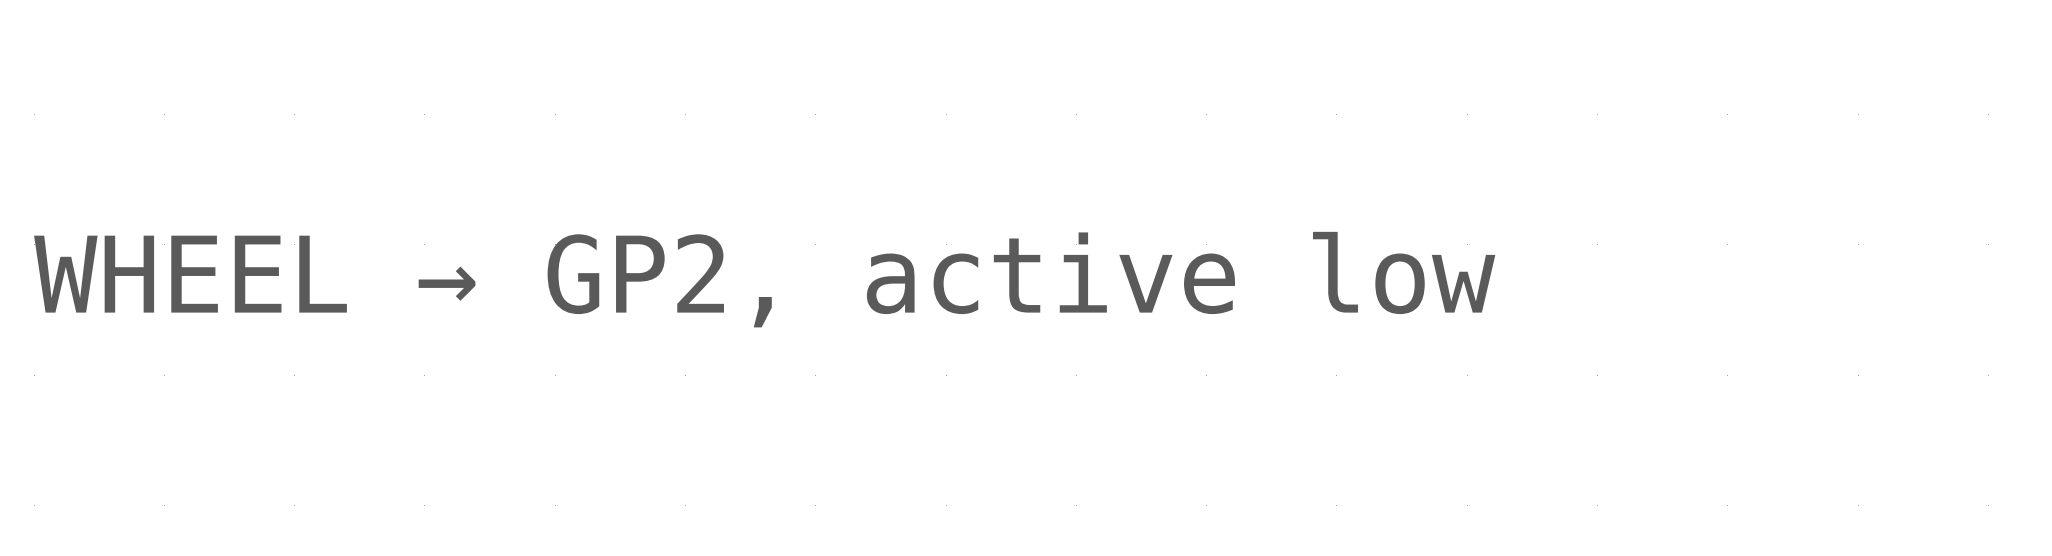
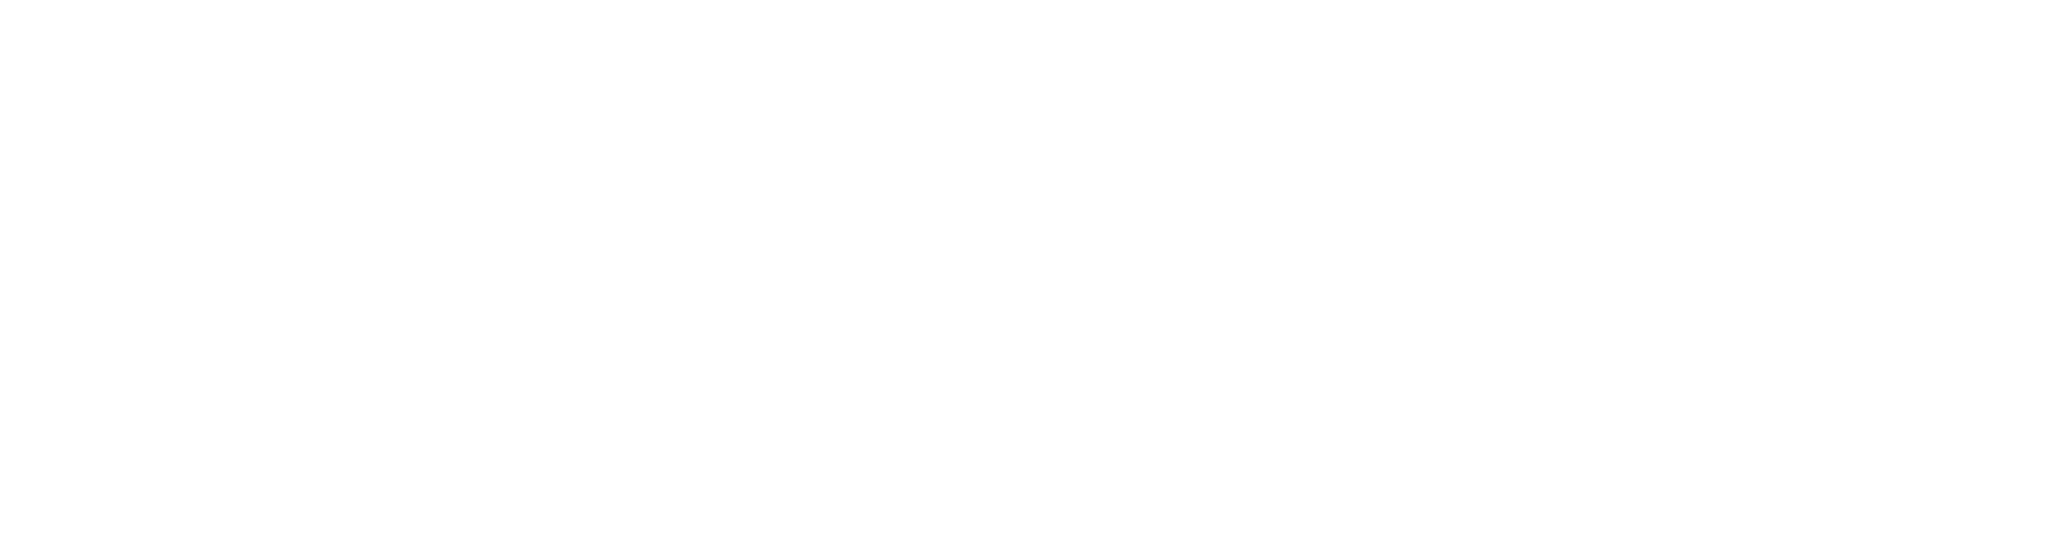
text: WHEEL → GP2, active low (764, 279) -> none

